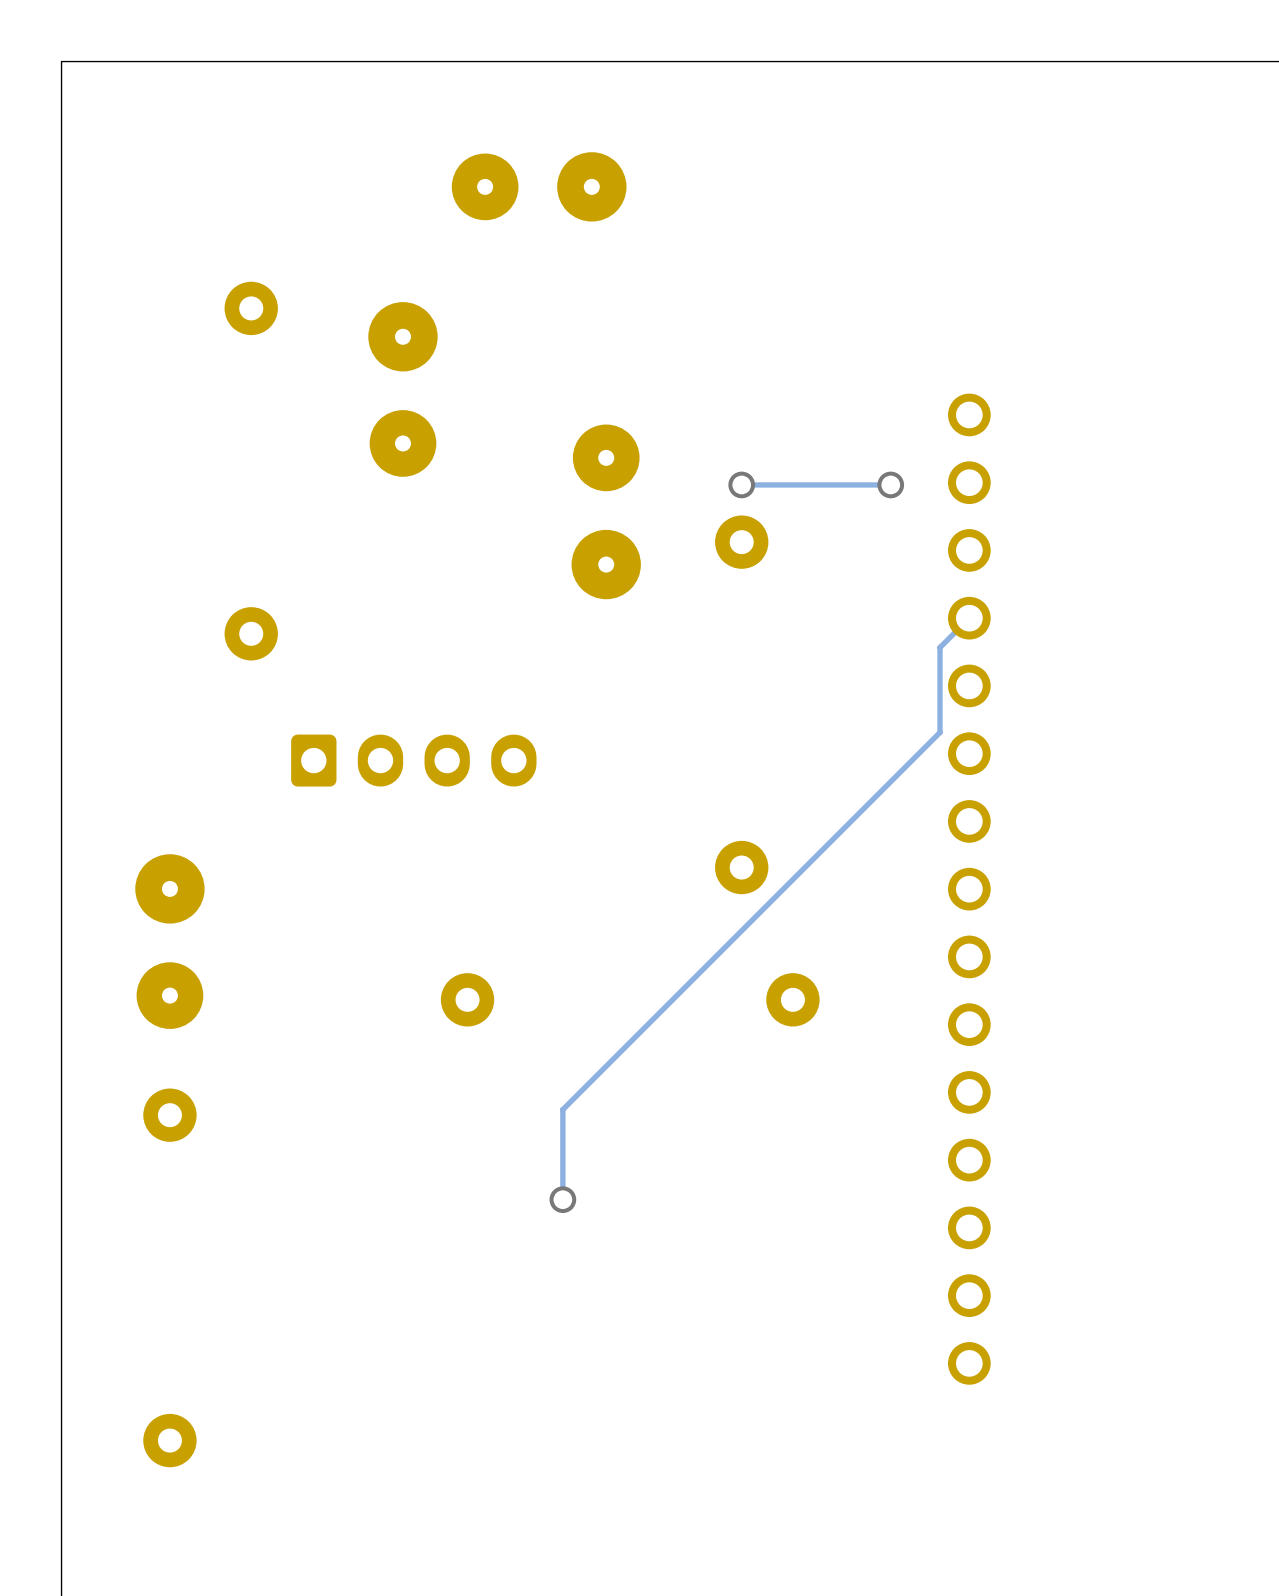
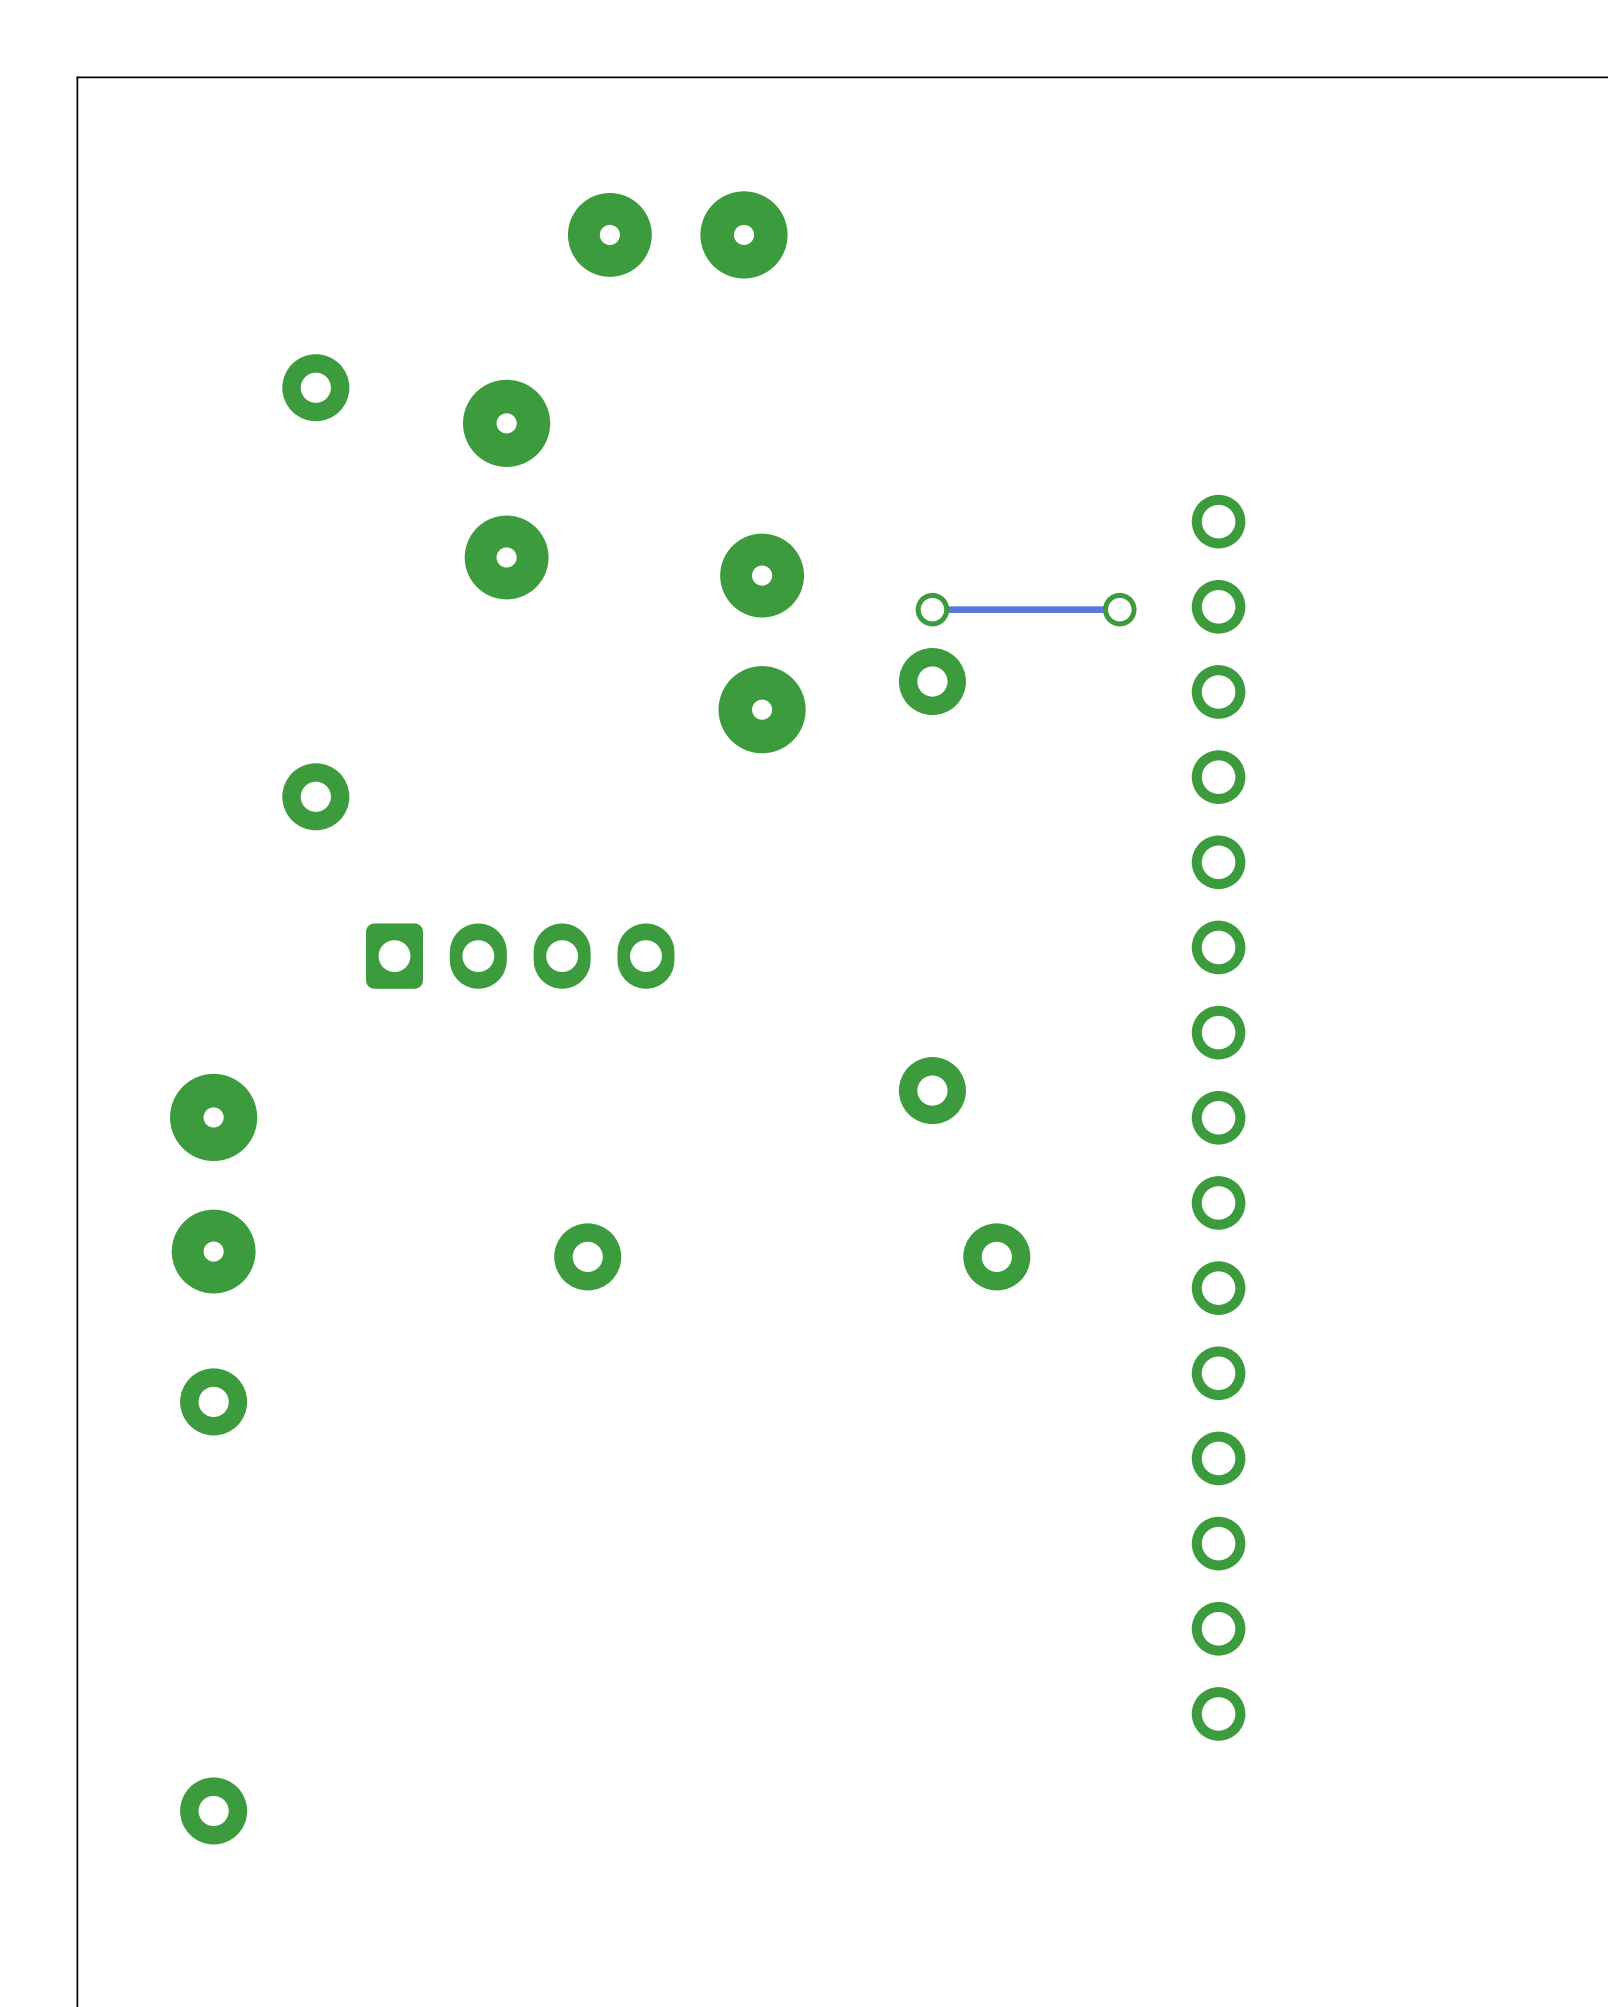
track: (969, 618) (940, 647) (940, 732) (562, 1109) (562, 1199) -> none
via: (562, 1199) -> none

